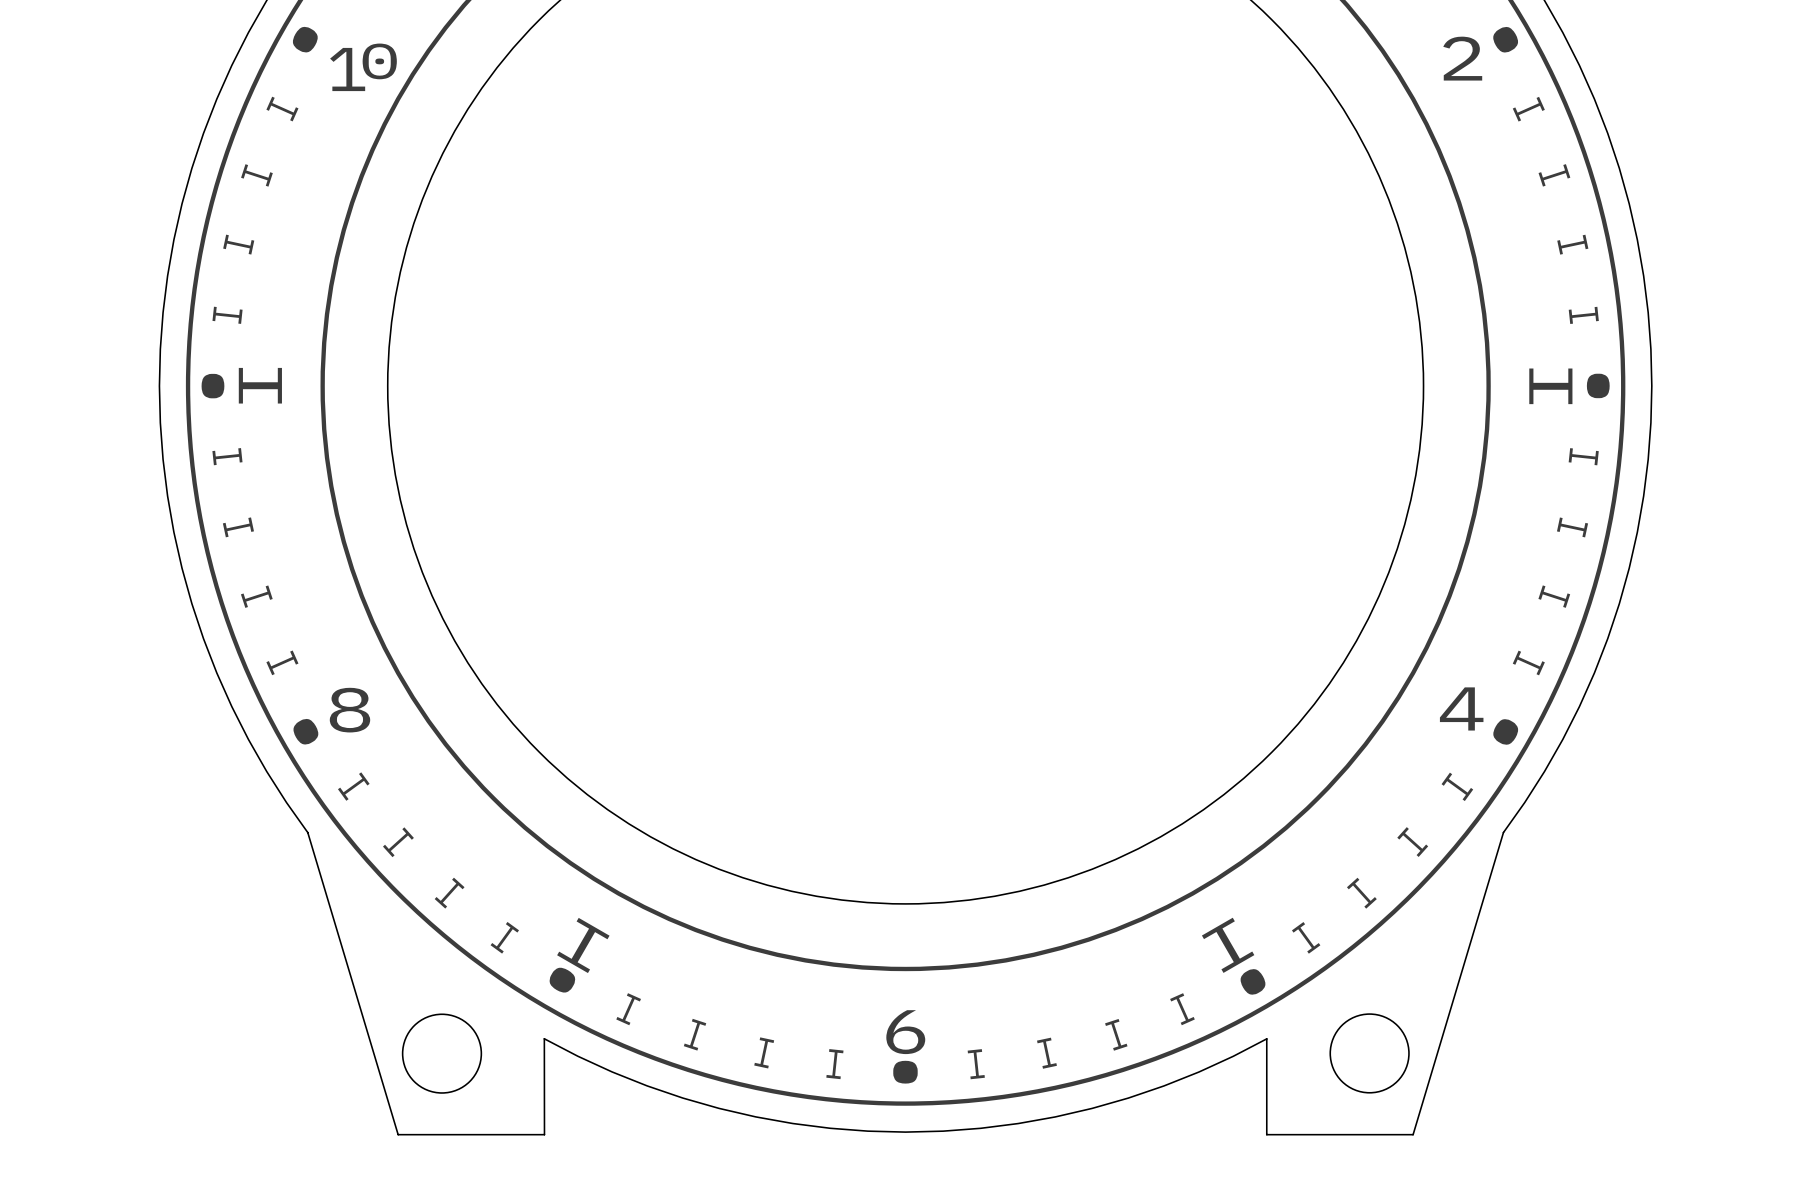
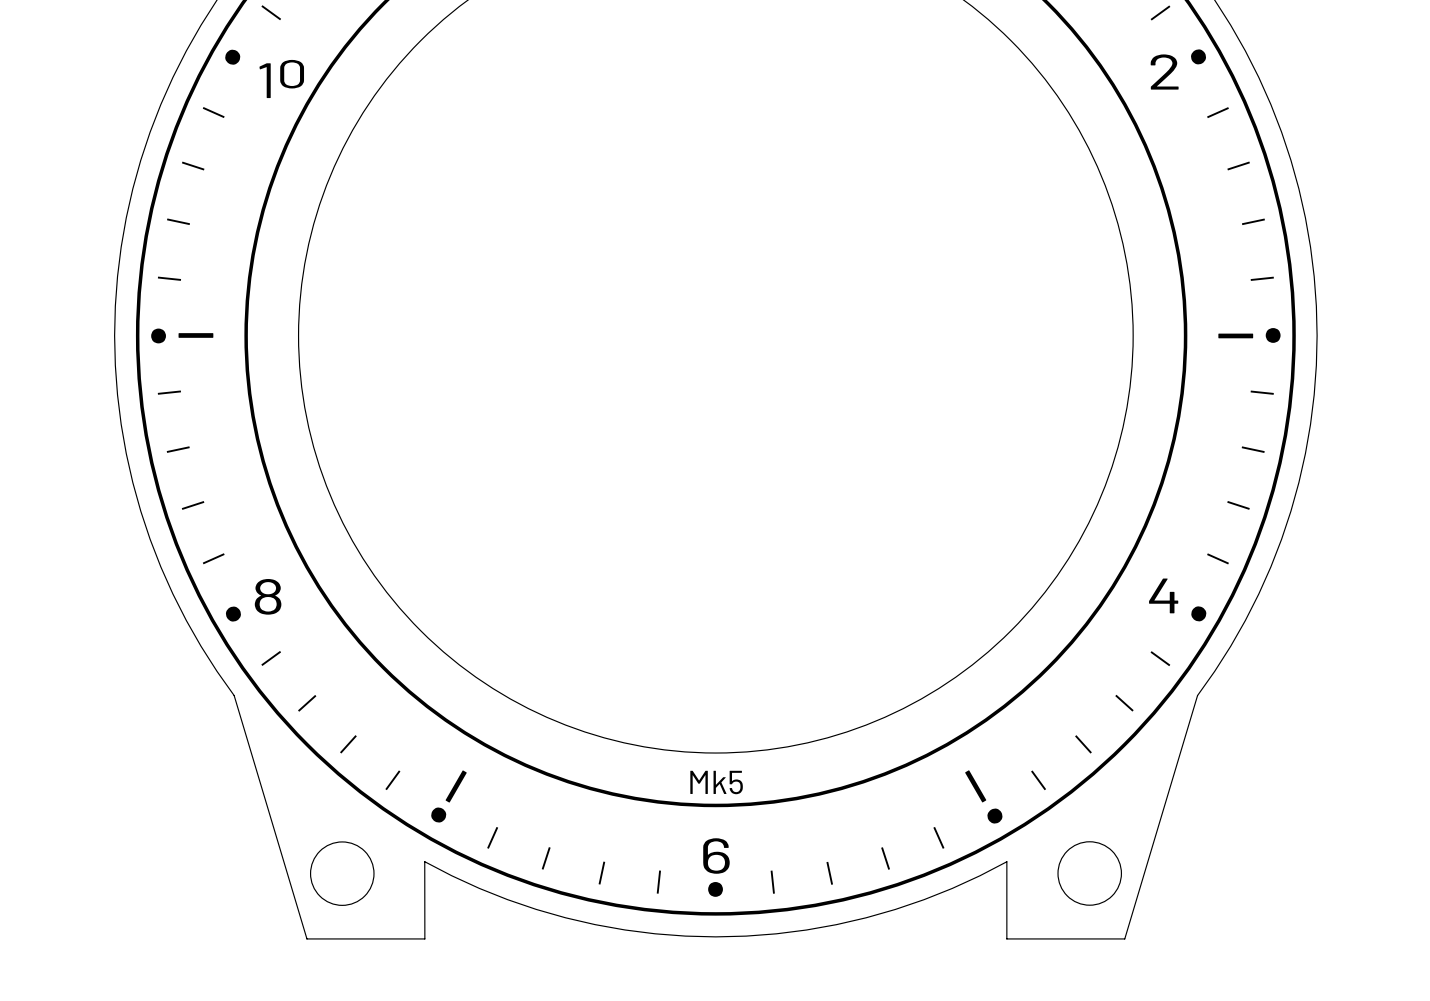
text: none -> Mk5 (716, 782)

